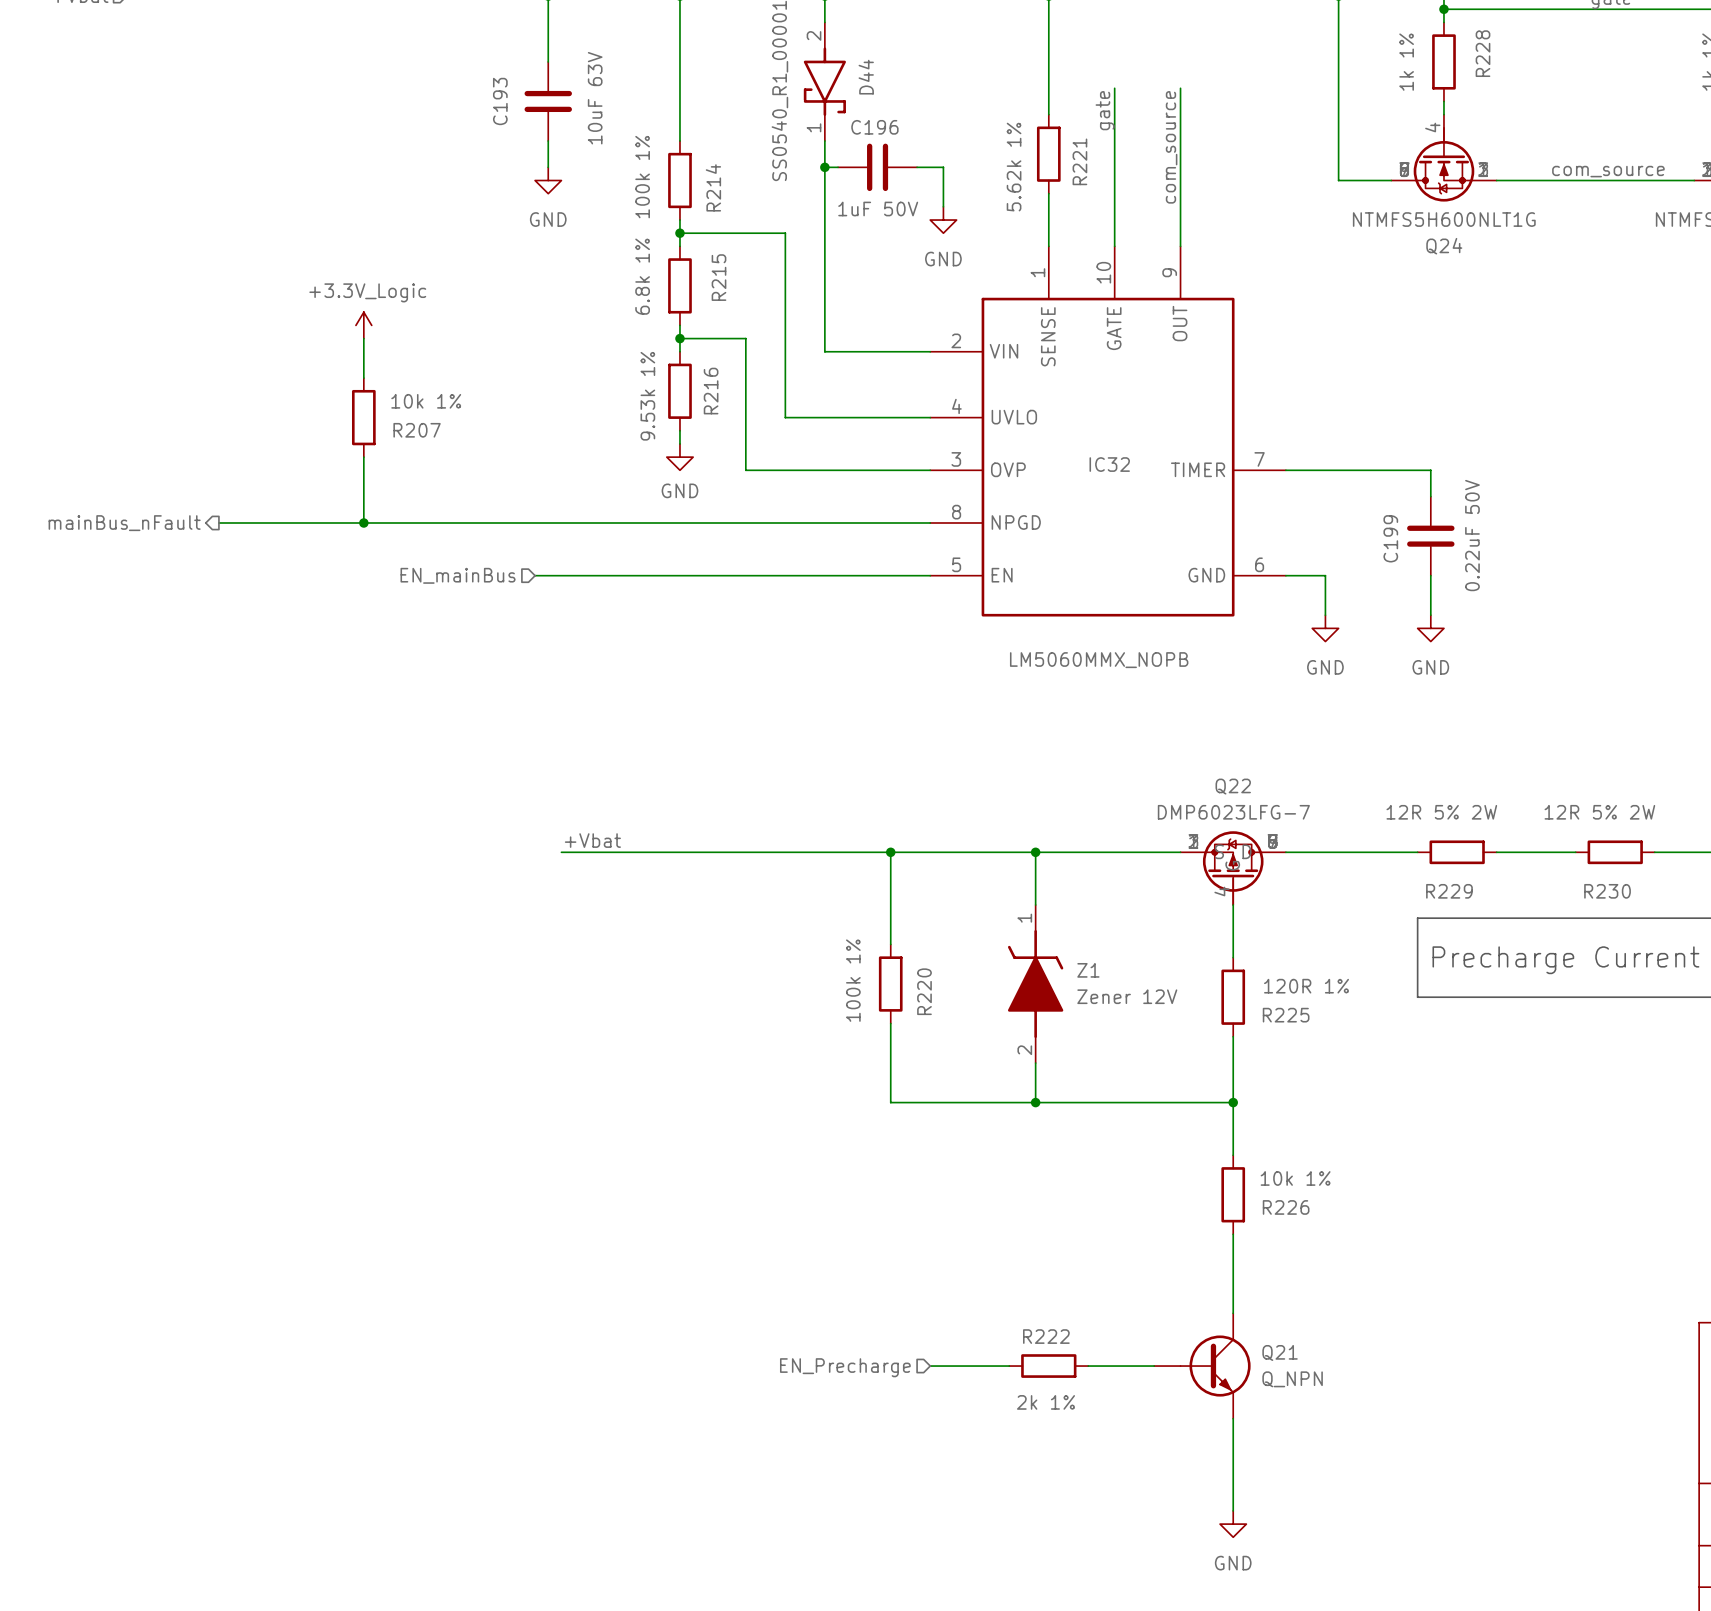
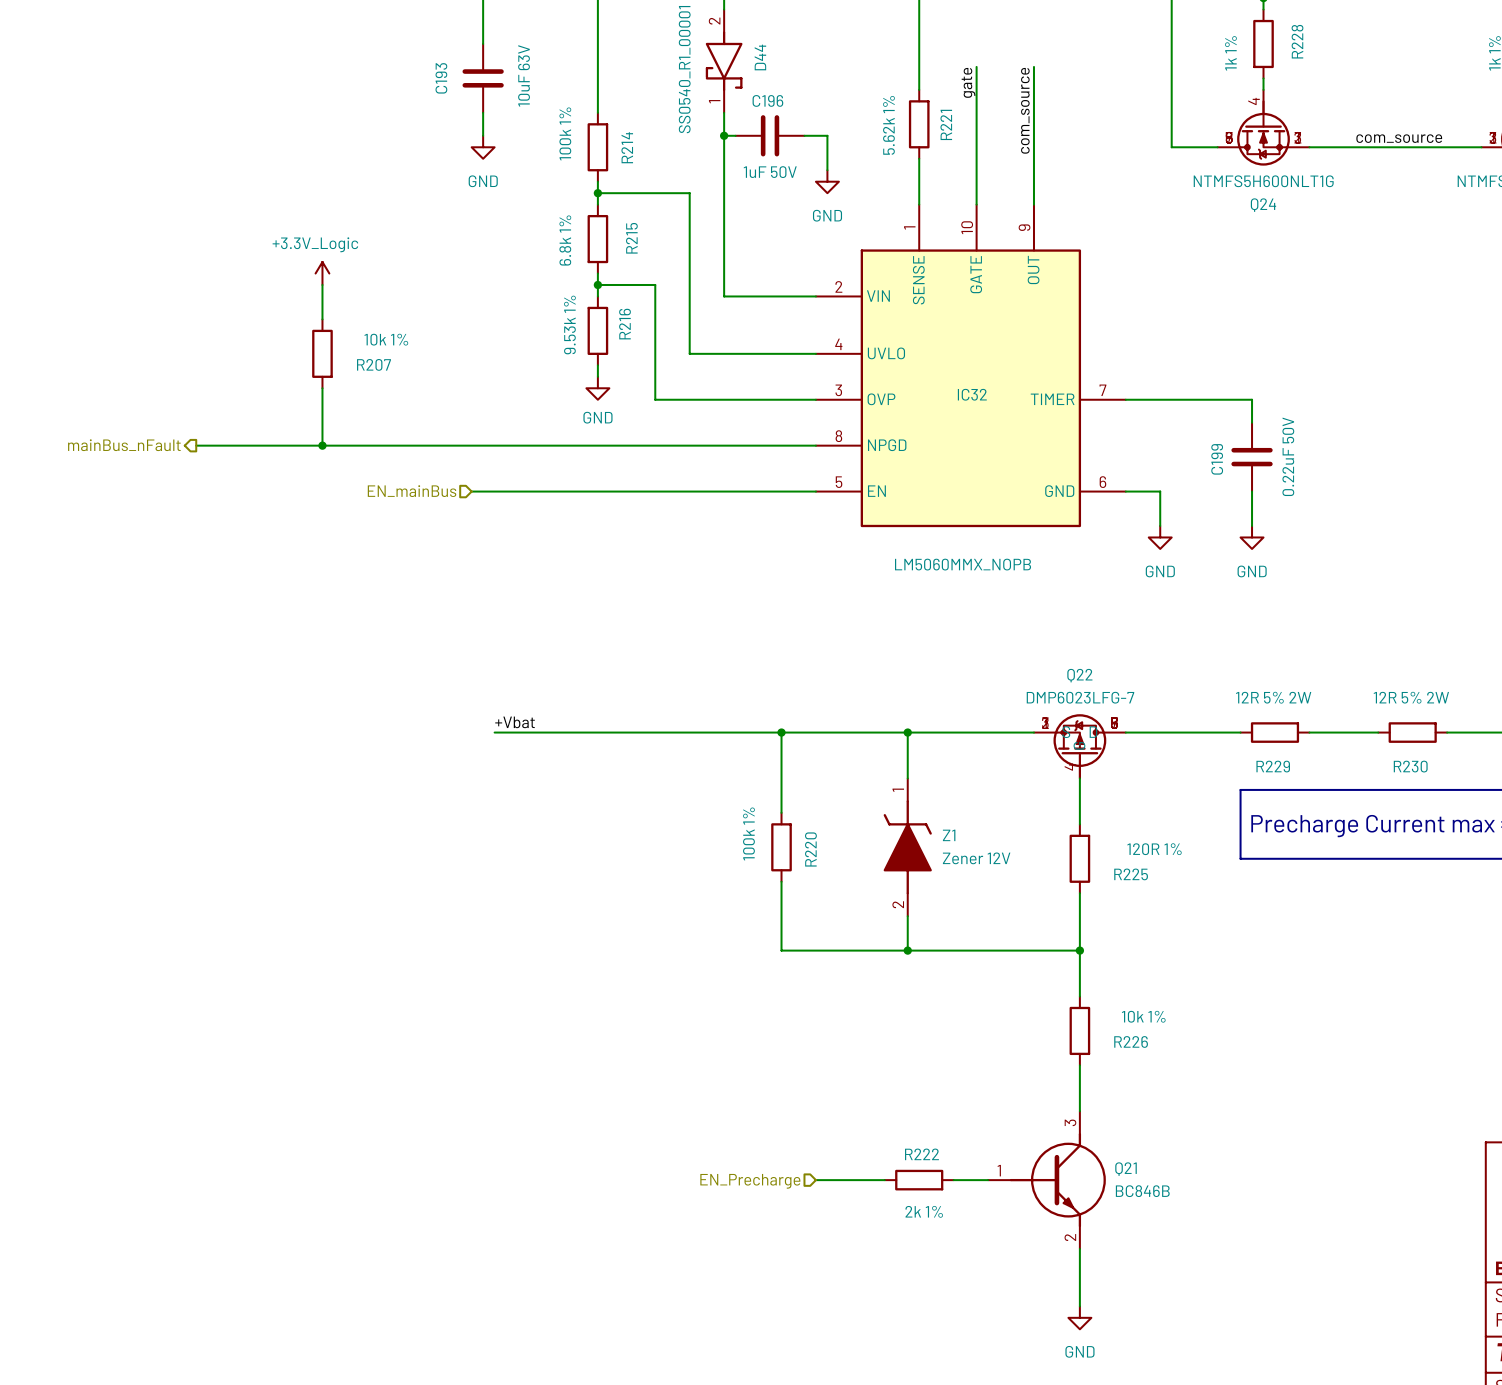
Q21 symbol: [1154, 1313, 1251, 1419] -> [988, 1111, 1106, 1249]
Q21 value: Q_NPN (1292, 1379) -> BC846B (1142, 1191)

